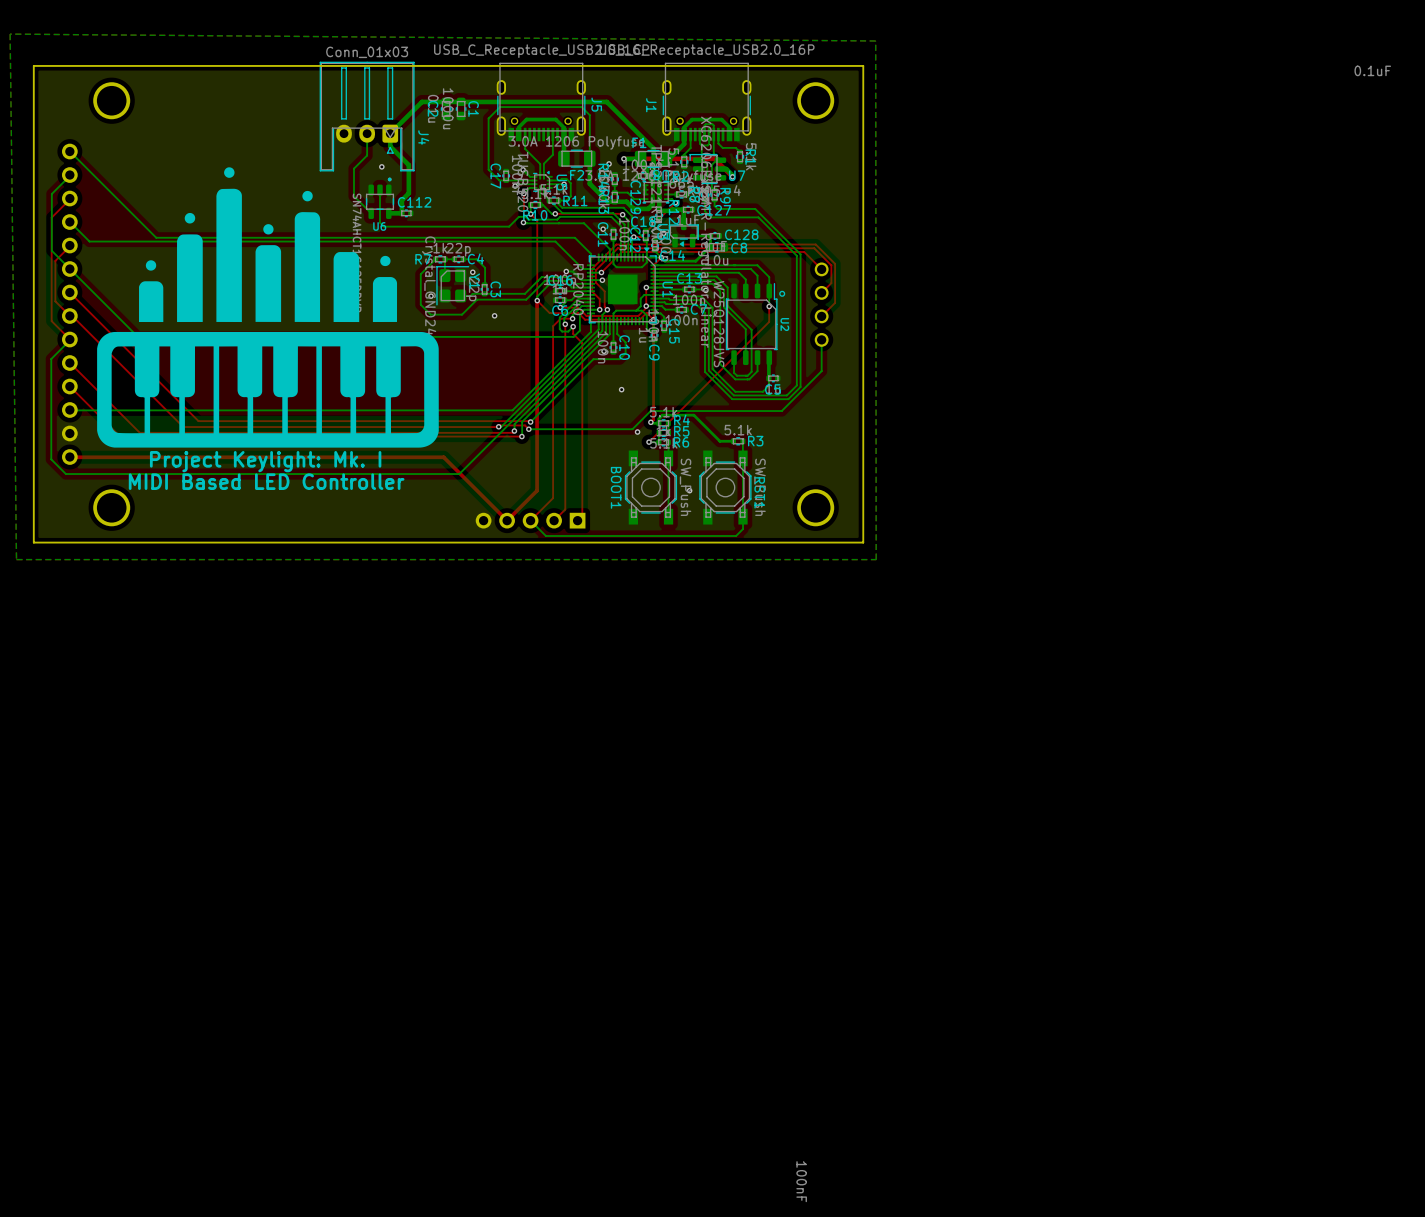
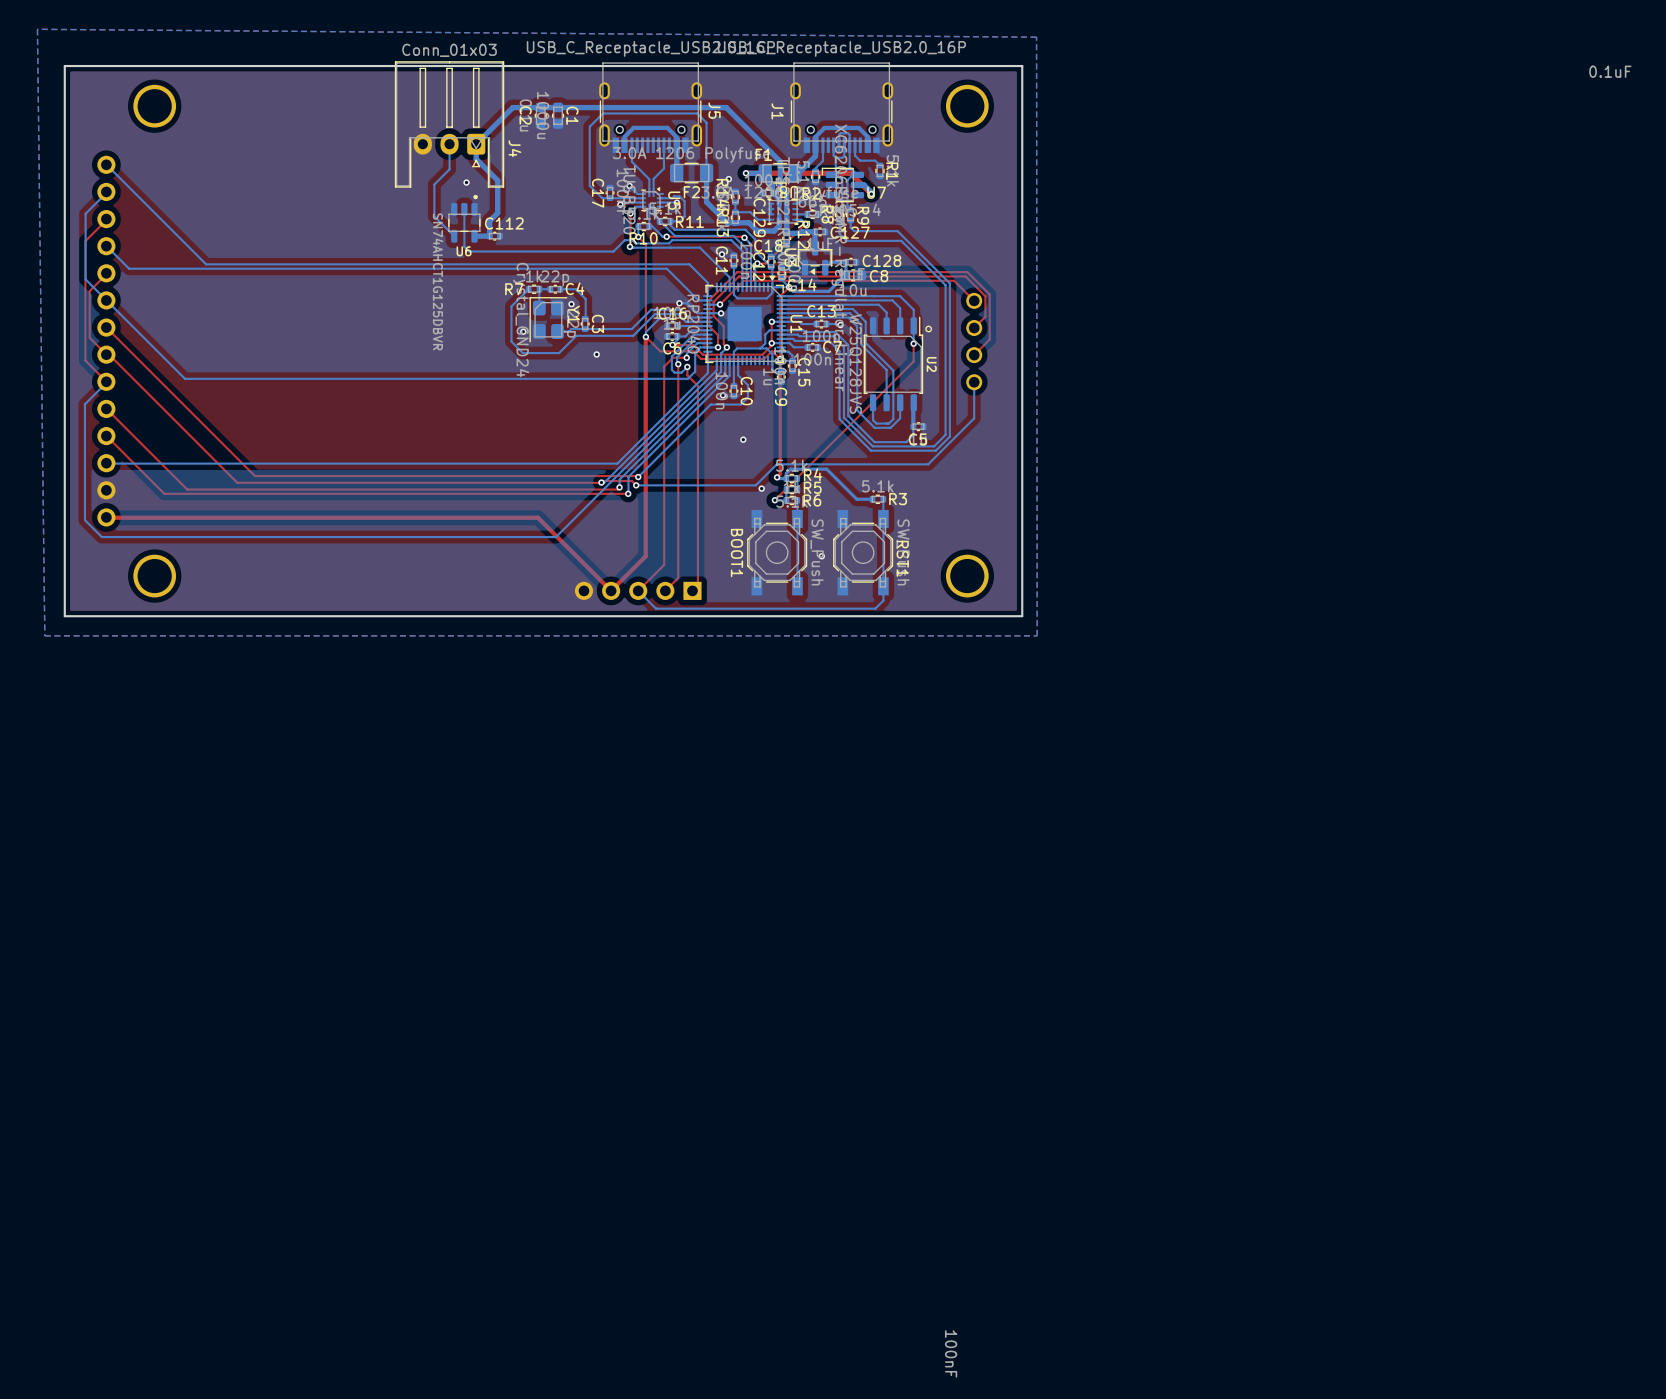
drawing: [97, 167, 439, 448] -> none
text: Project Keylight: Mk. I (265, 461) -> none
text: MIDI Based LED Controller (266, 481) -> none

